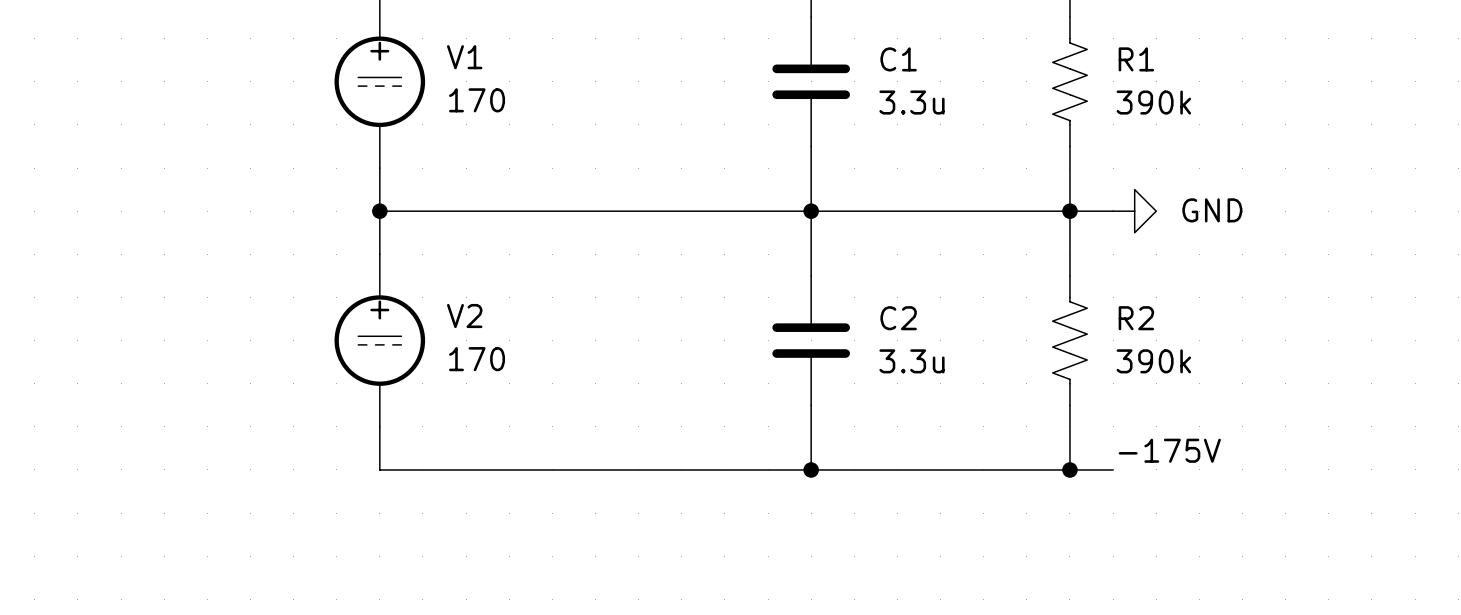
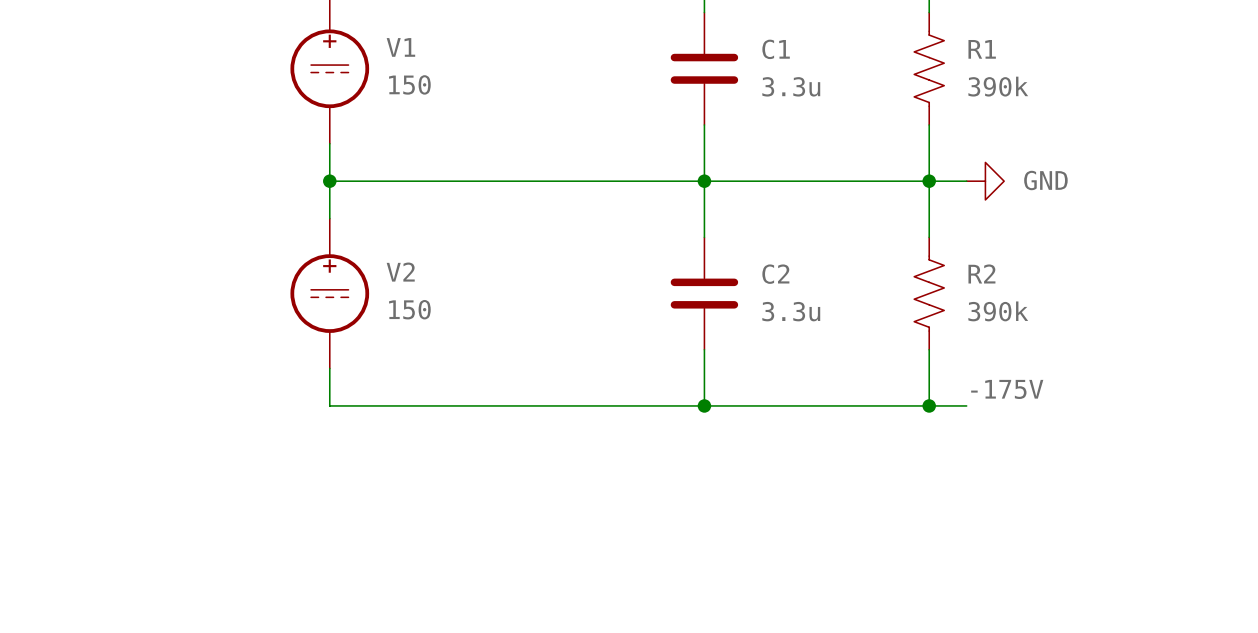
V1 value: 170 (477, 100) -> 150 (409, 84)
V2 value: 170 (477, 359) -> 150 (409, 309)

